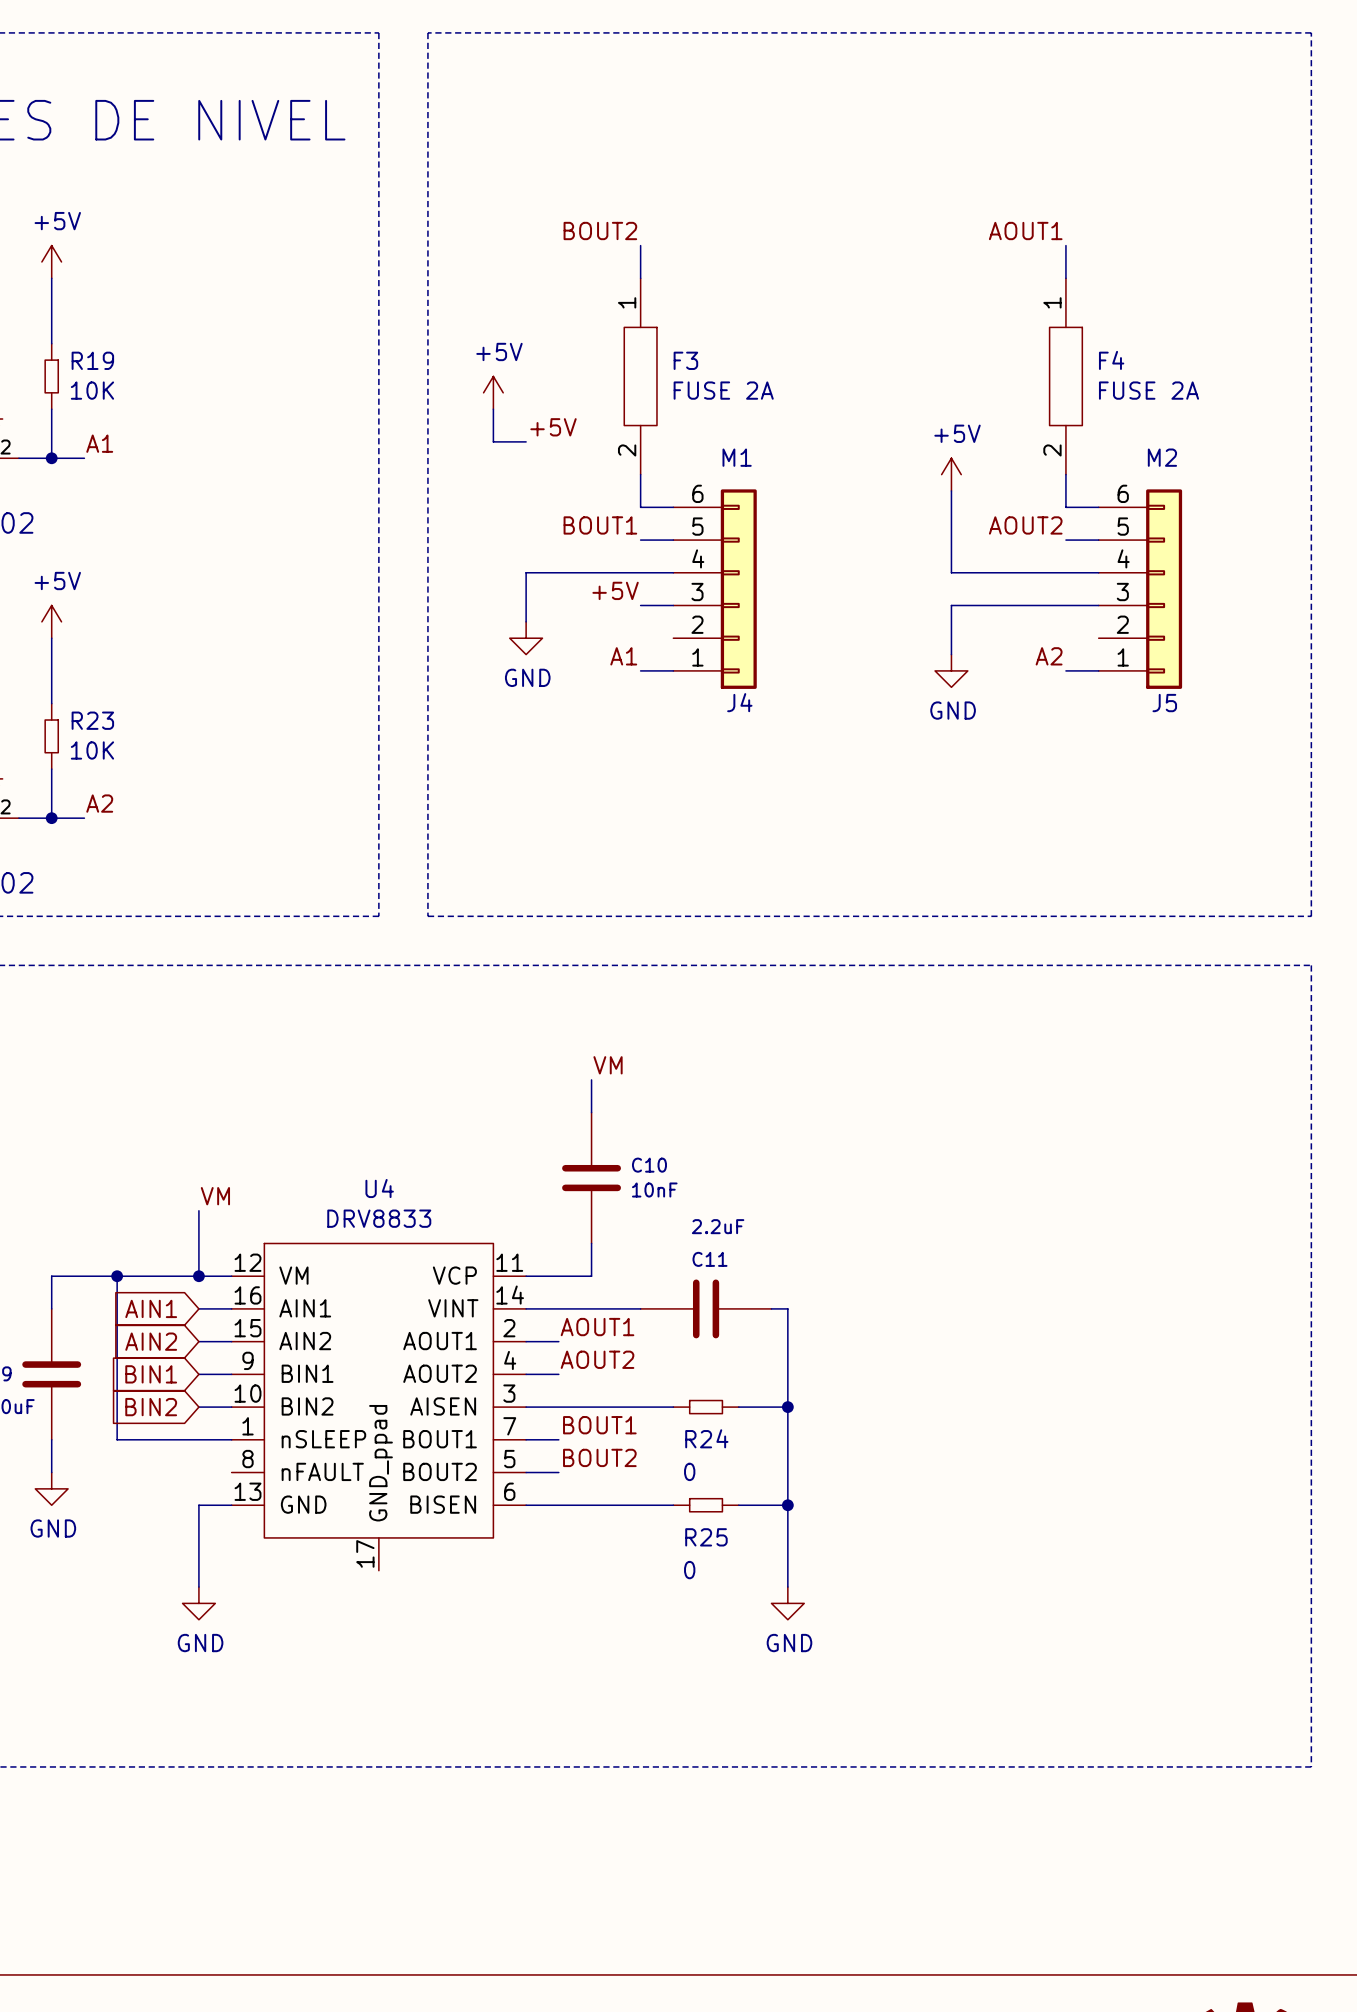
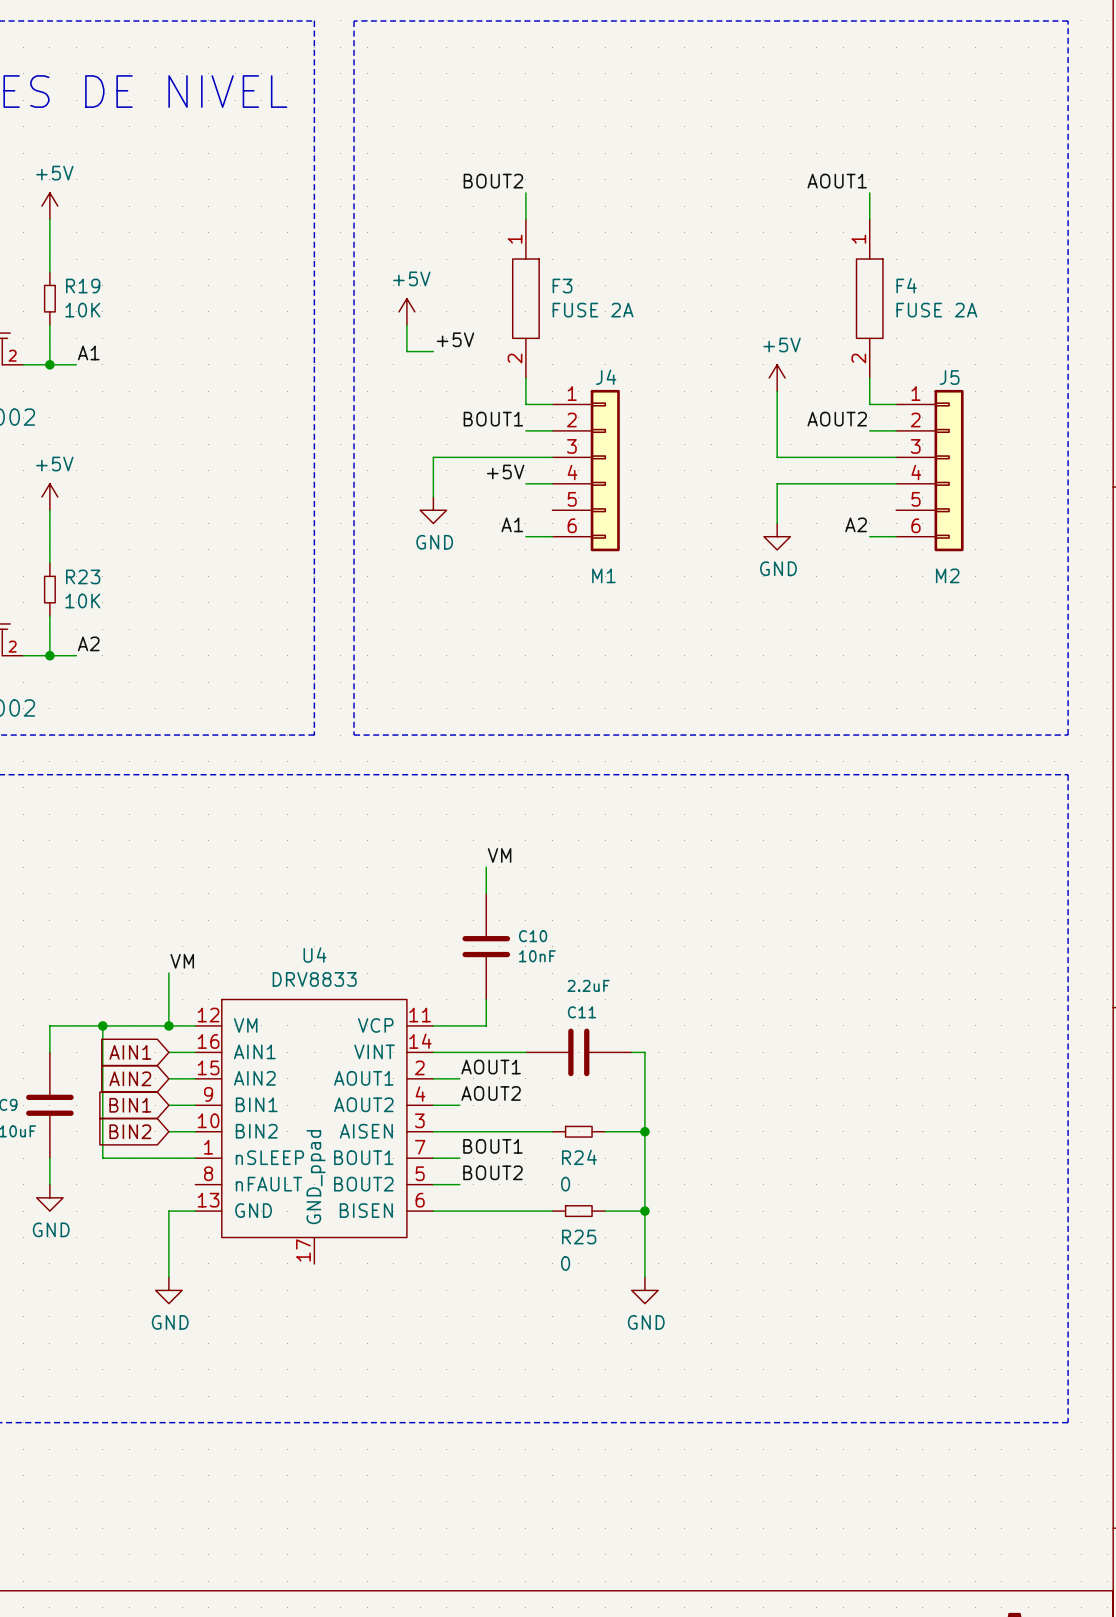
J4 flip: as is (738, 589) -> up-down (605, 470)
J5 flip: as is (1164, 589) -> up-down (949, 470)

